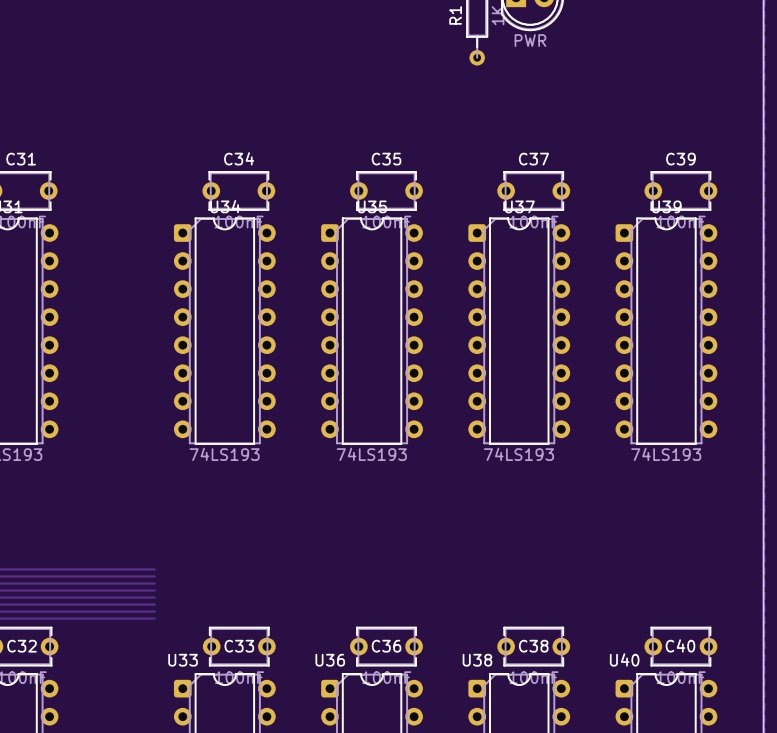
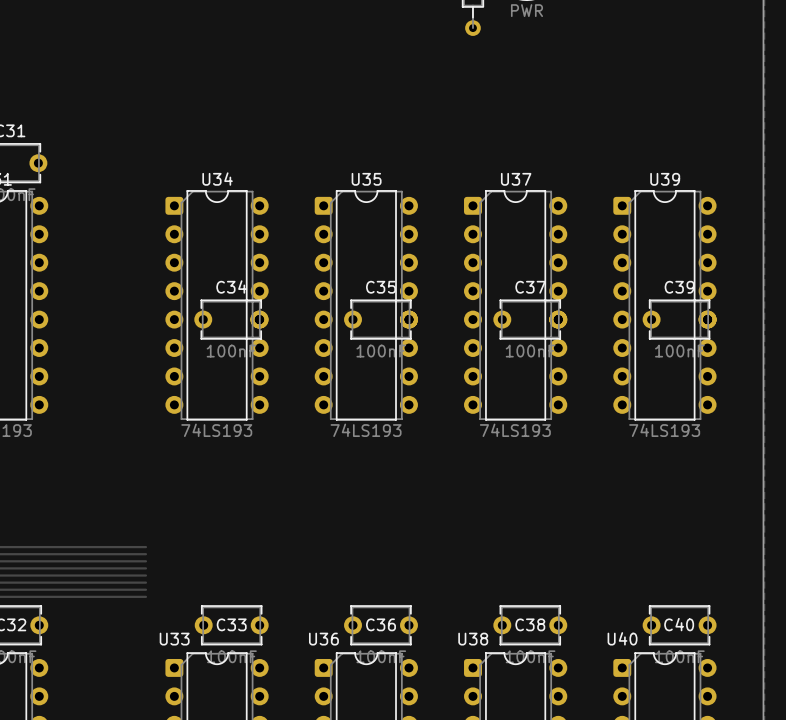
C34 position: (238, 190) -> (231, 319)
C35 position: (386, 190) -> (381, 319)
C37 position: (533, 190) -> (530, 319)
C39 position: (680, 190) -> (679, 319)

